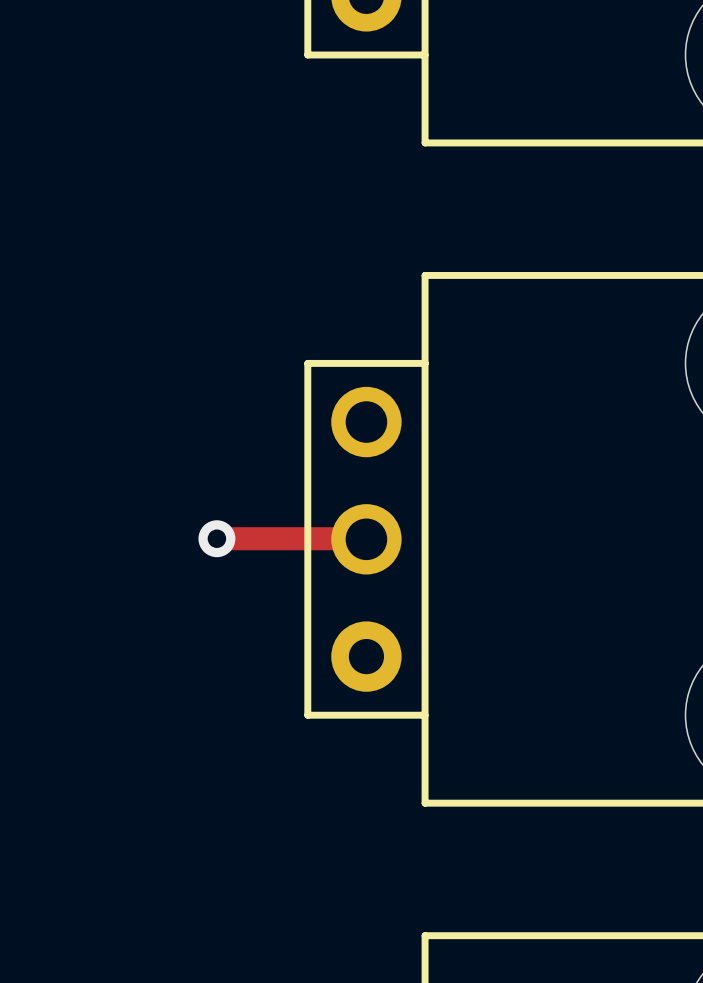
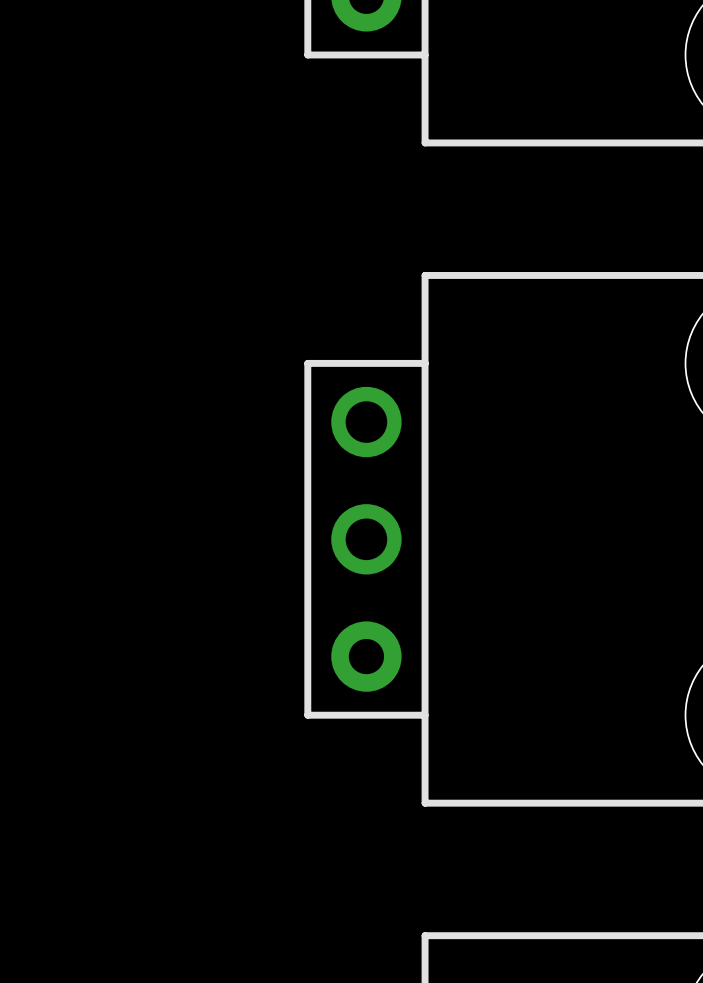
track: (216, 538) (365, 538) -> none
via: (216, 538) -> none

